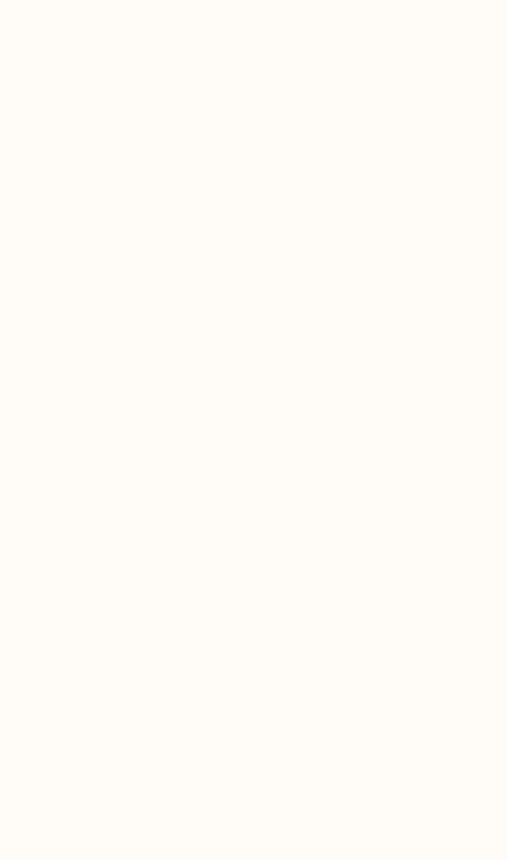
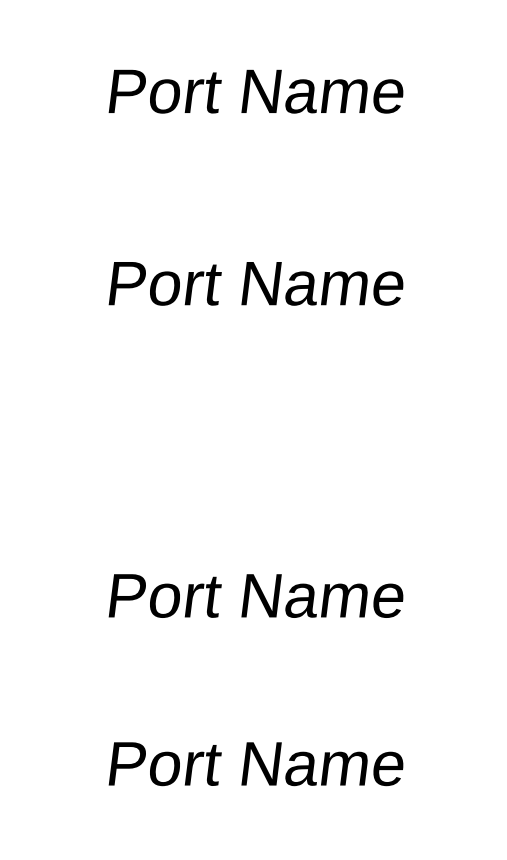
text: none -> Port Name (256, 91)
text: none -> Port Name (256, 283)
text: none -> Port Name (256, 596)
text: none -> Port Name (256, 764)

